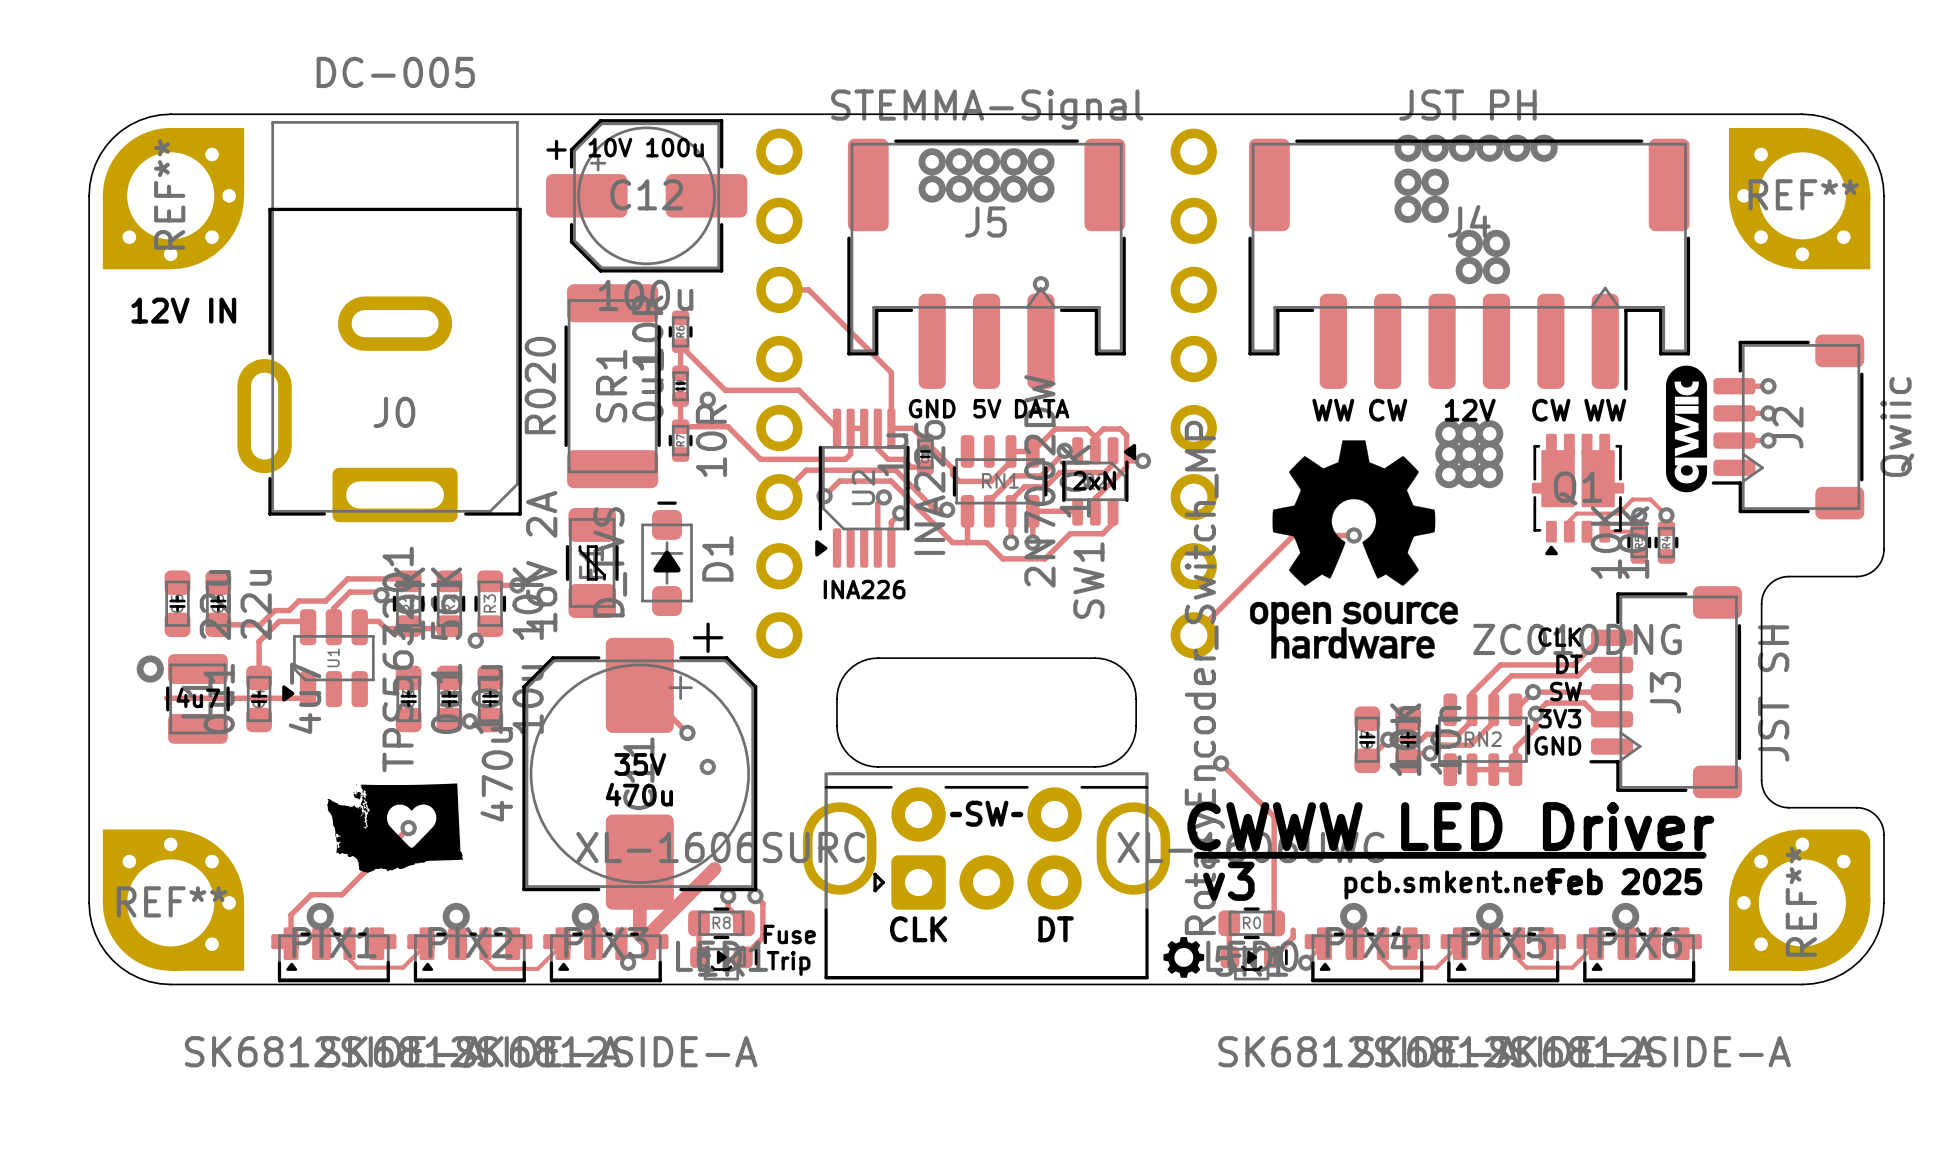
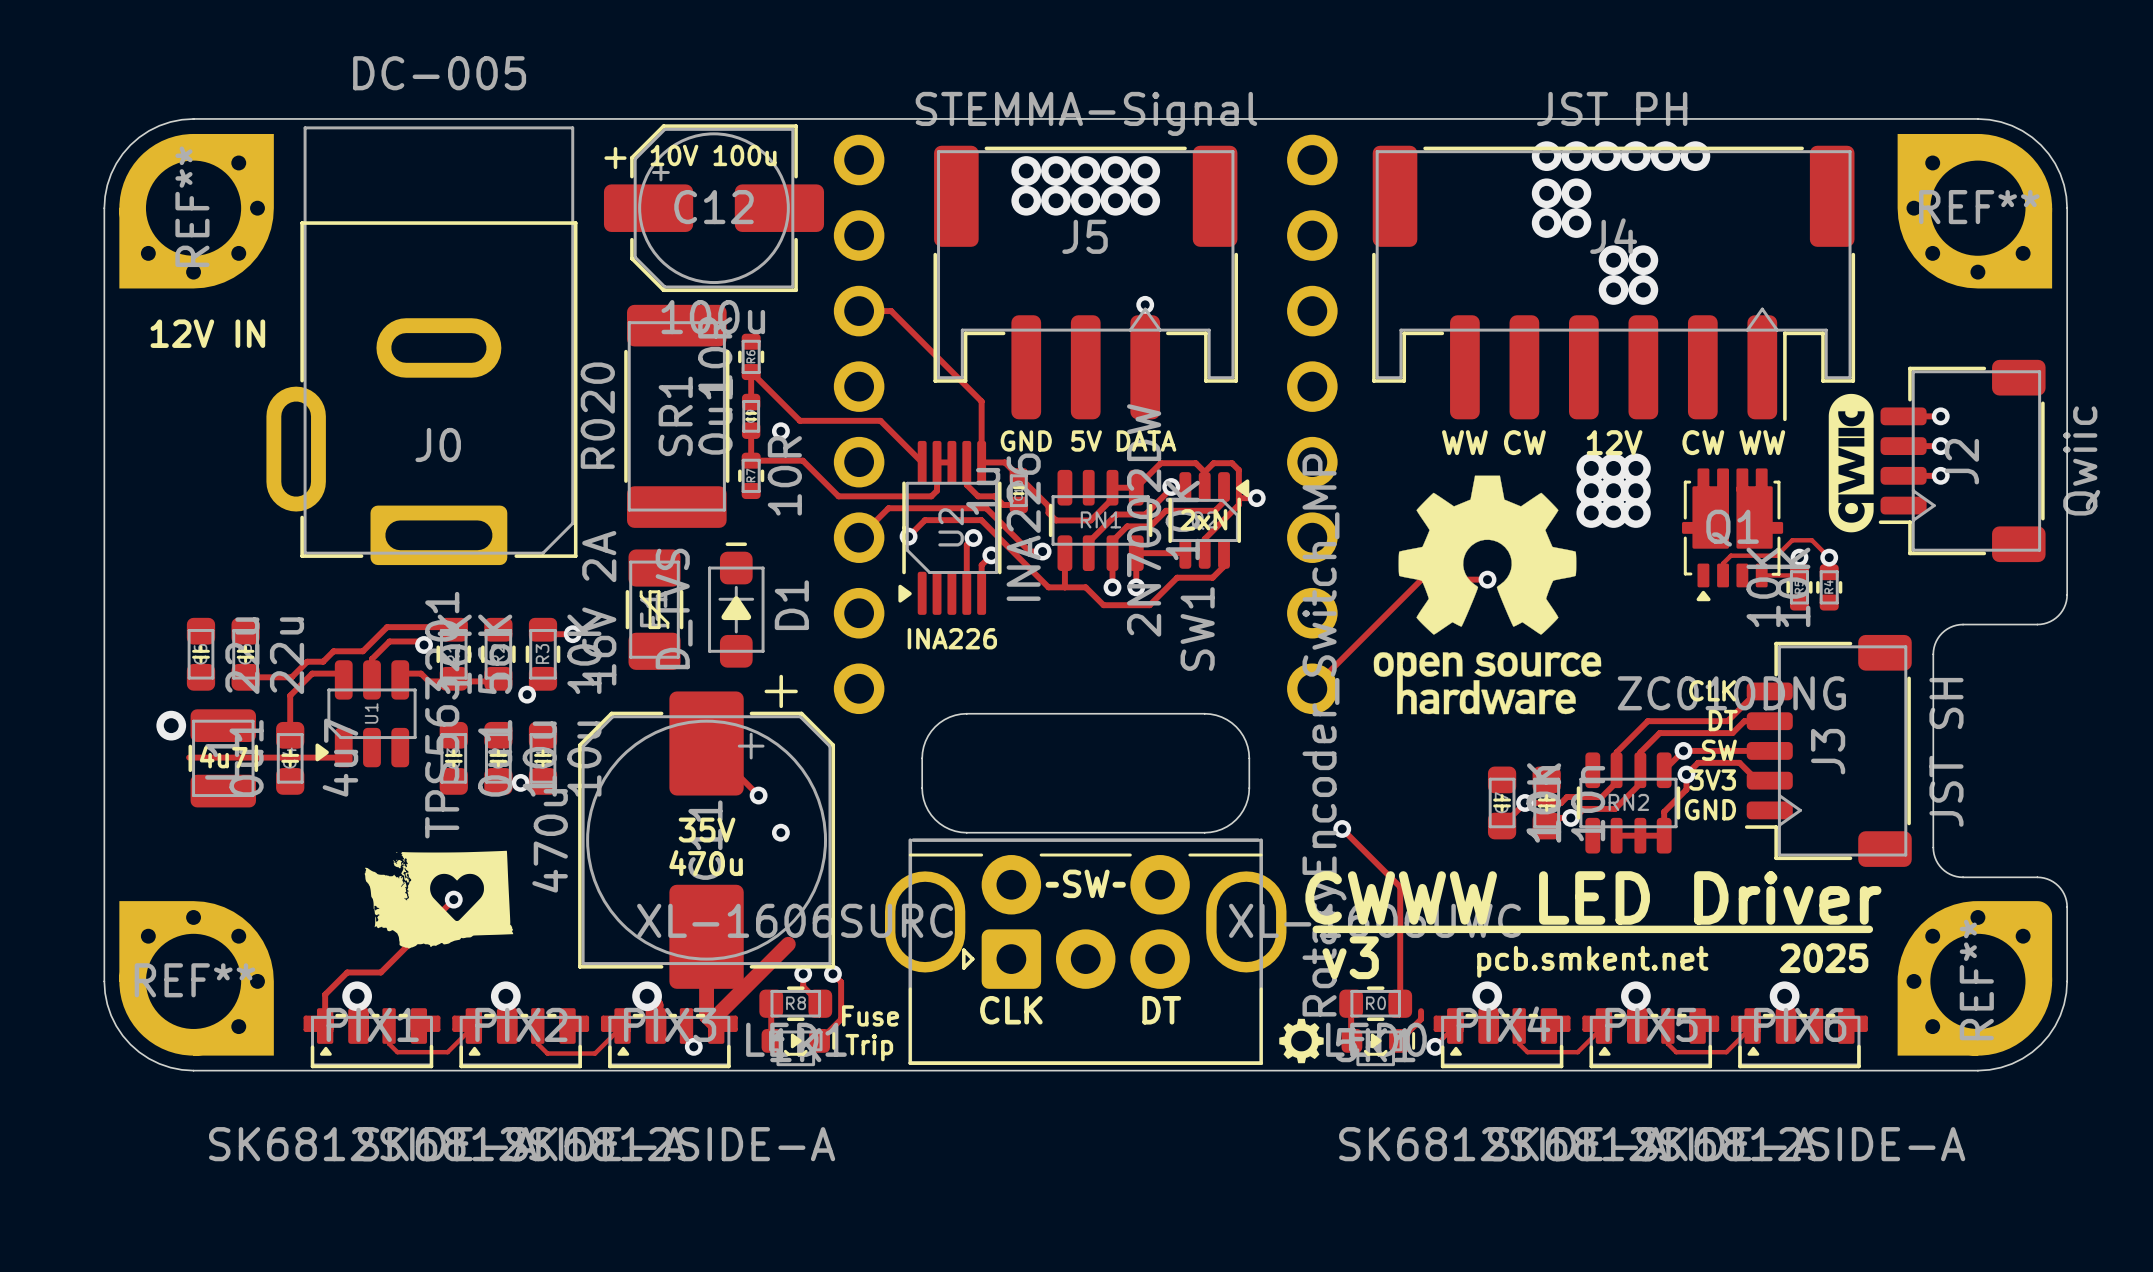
text: Feb 2025 (1625, 881) -> 2025 (1824, 958)

